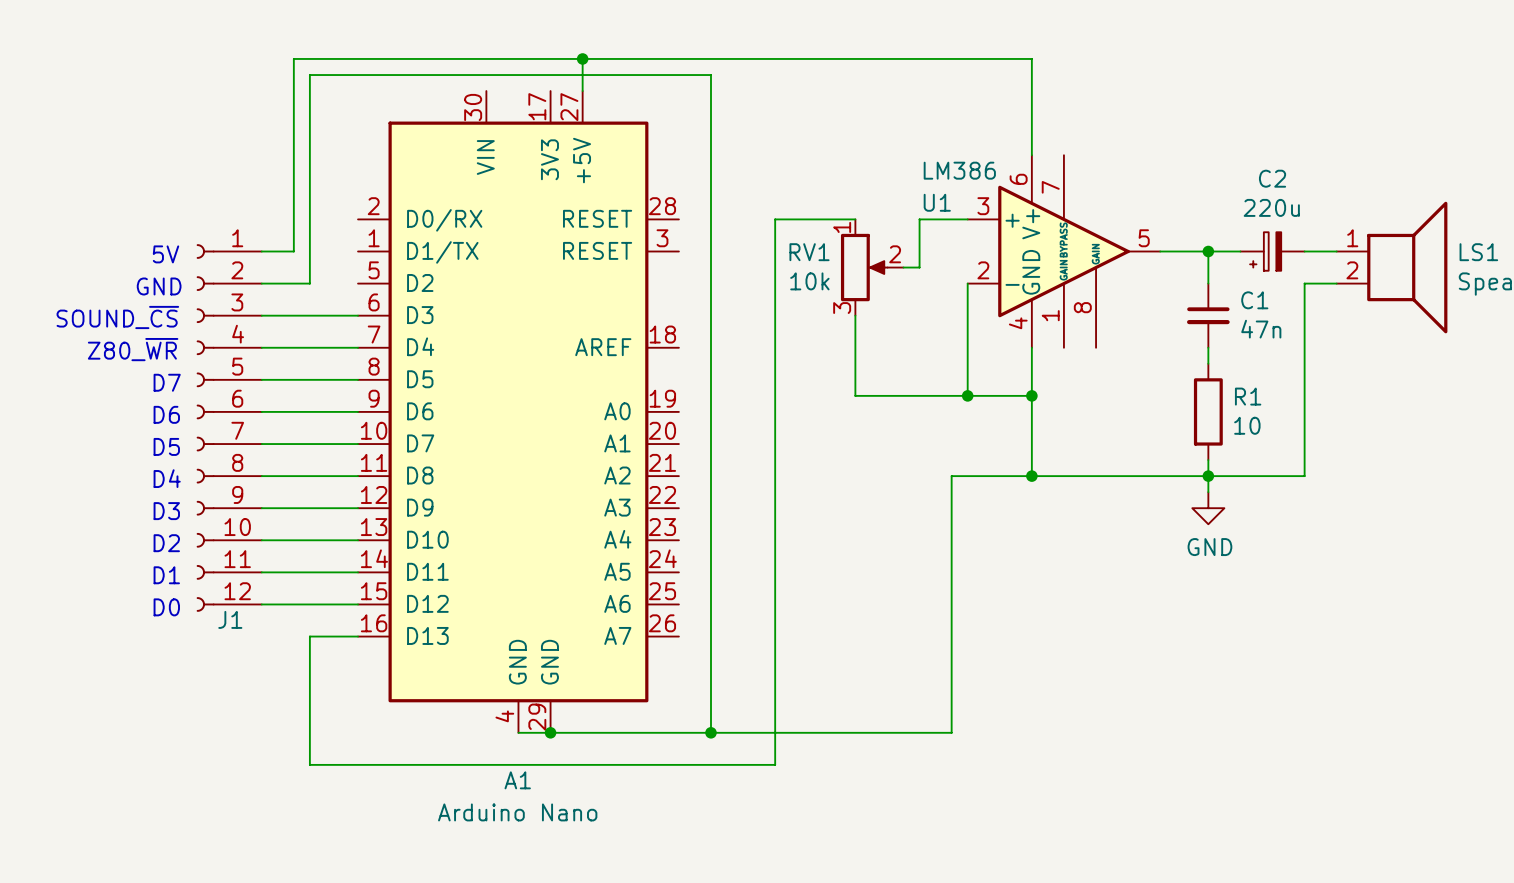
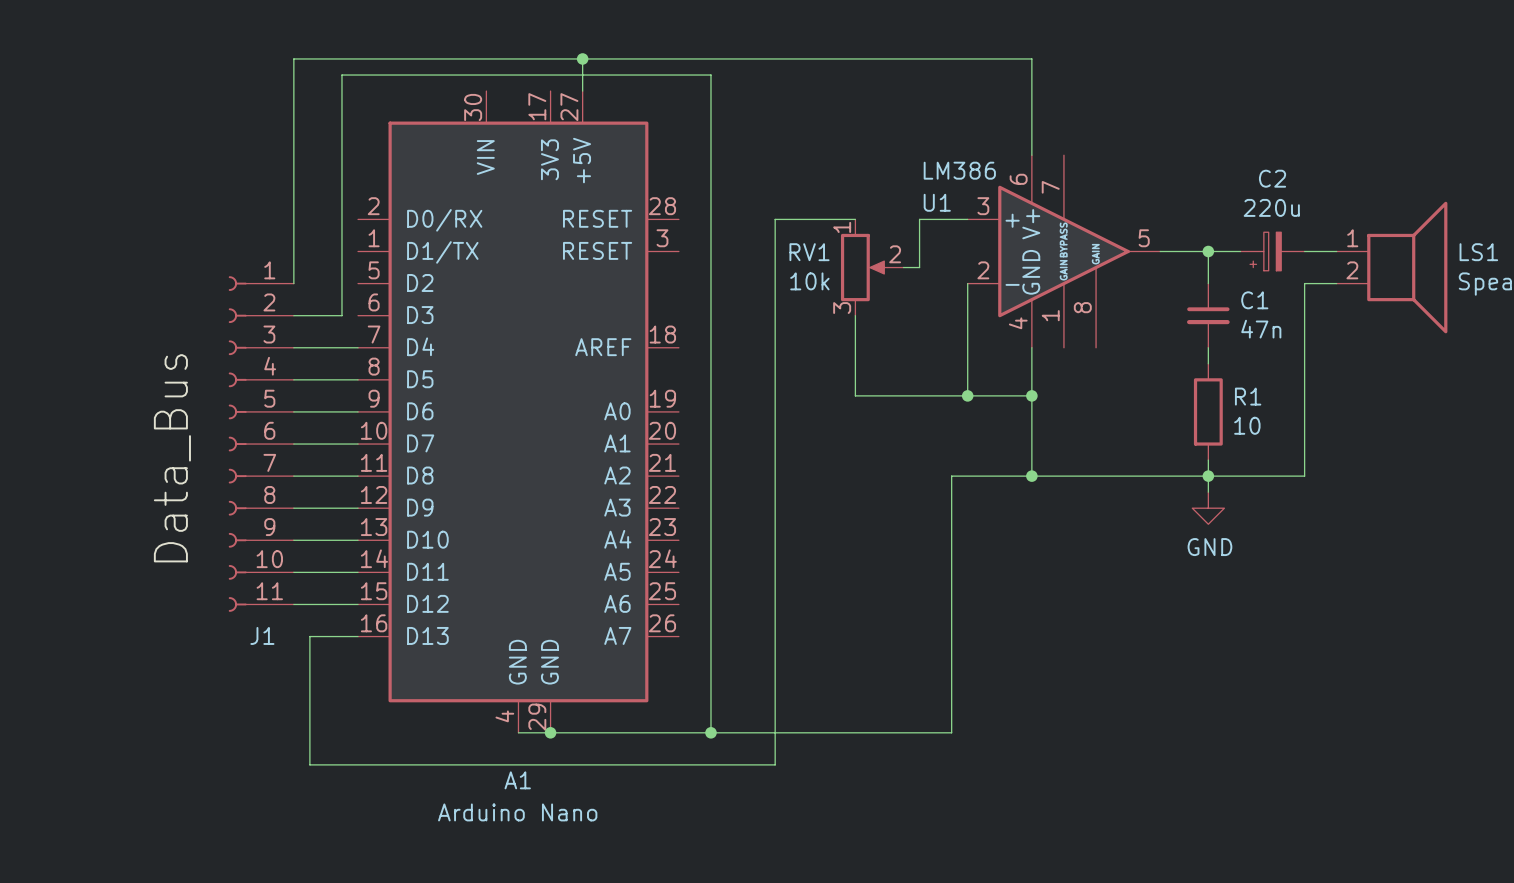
wire: (341, 75) (309, 75) (309, 283) (261, 283) -> (341, 75) (341, 315)
J1 symbol: [196, 244, 262, 612] -> [228, 276, 294, 612]
wire: (261, 251) (293, 251) -> (293, 283) (293, 251)
text: 5V (166, 254) -> none
text: GND (159, 286) -> none
wire: (341, 315) (358, 315) -> none
text: SOUND_~{CS} (117, 317) -> none
text: Z80_~{WR} (133, 349) -> none
text: D7 (167, 382) -> none
text: D6 (166, 414) -> none
text: D5 (166, 446) -> none
label: none -> Data_Bus (172, 458)
text: D4 (167, 478) -> none
text: D3 (166, 511) -> none
text: D2 (166, 543) -> none
text: D1 (166, 575) -> none
text: D0 (166, 607) -> none

